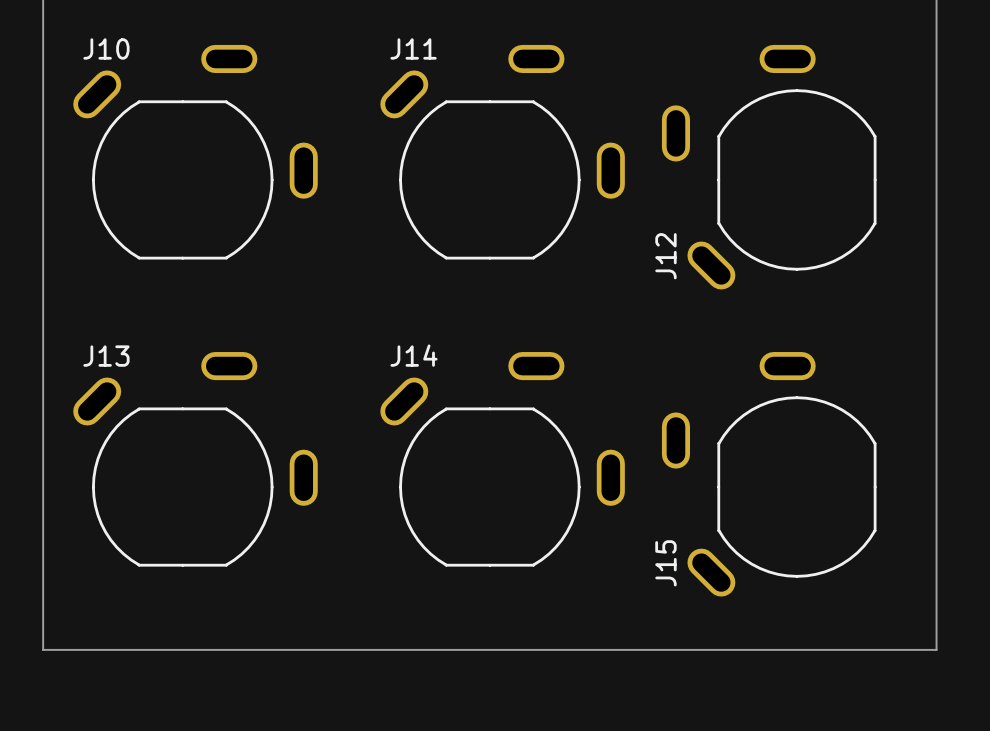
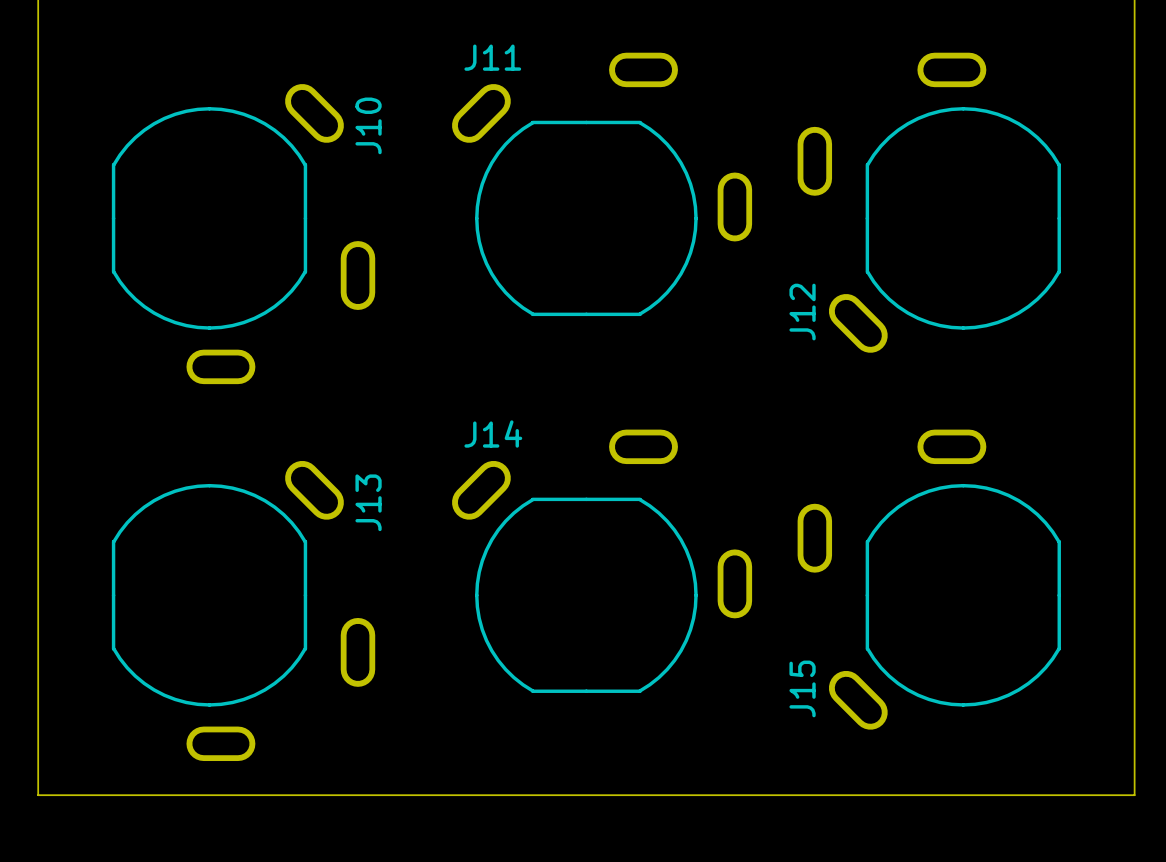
J10 rotation: 0° (195, 152) -> 90° clockwise (243, 234)
J13 rotation: 0° (195, 459) -> 90° clockwise (243, 610)

